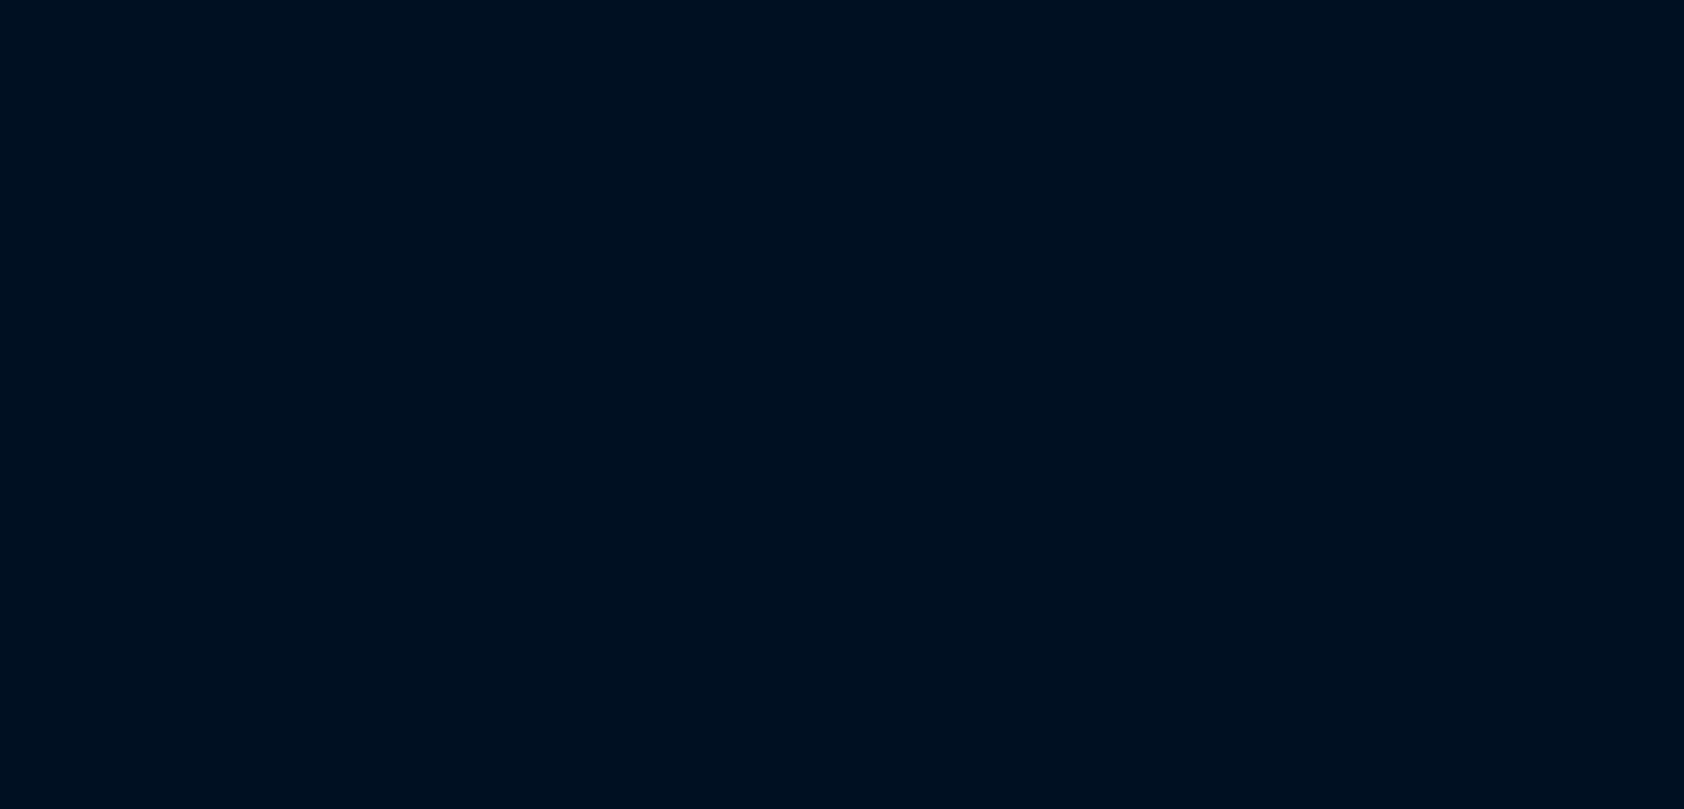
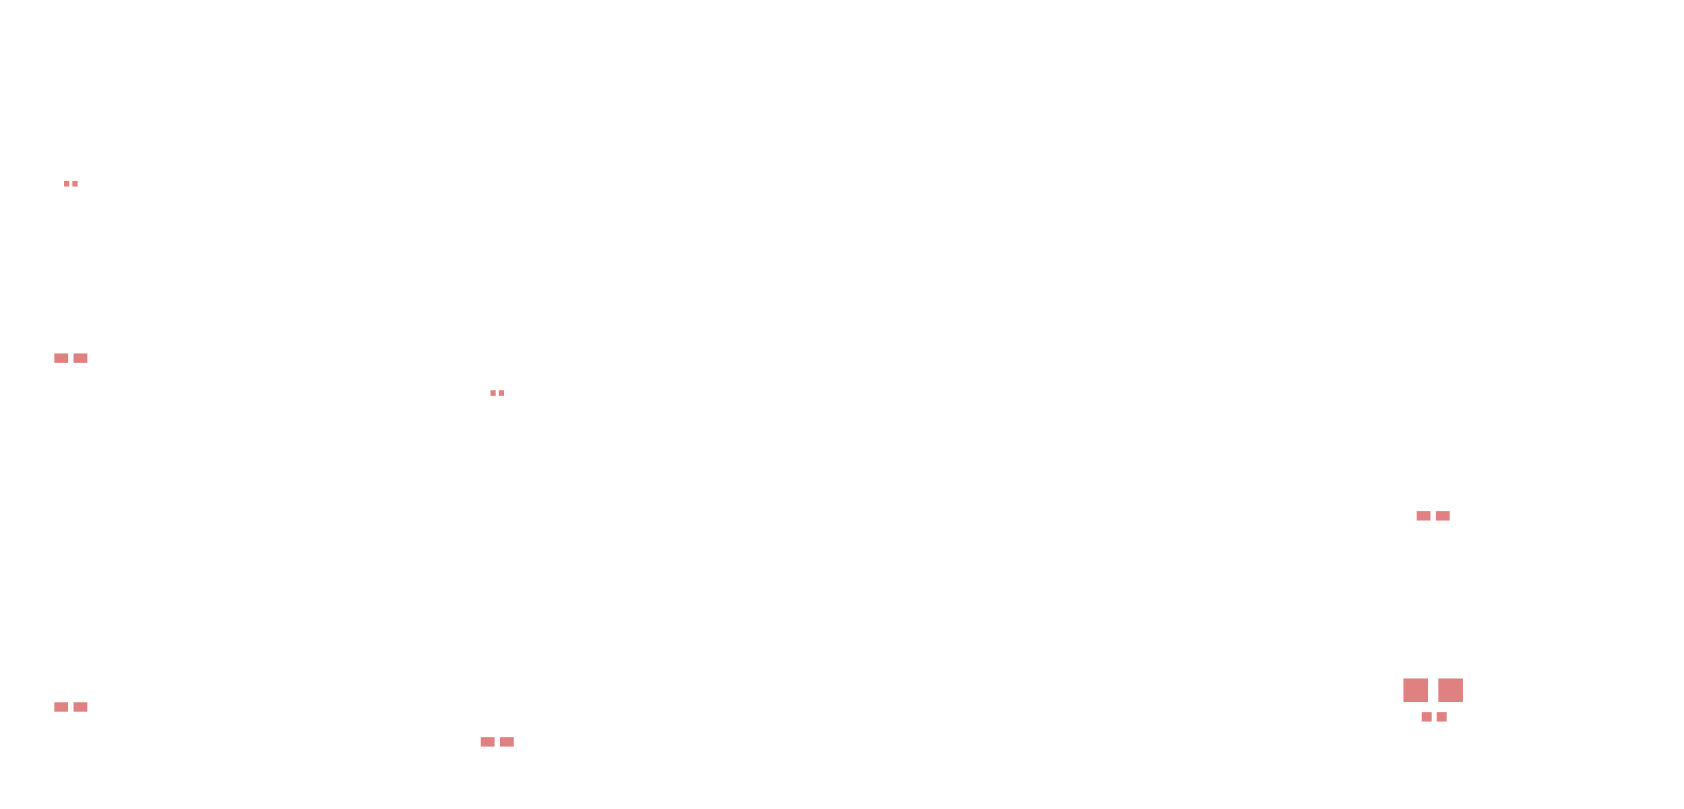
part: none -> (70, 183)
part: none -> (70, 358)
part: none -> (497, 393)
part: none -> (1433, 515)
part: none -> (1433, 690)
part: none -> (70, 706)
part: none -> (1434, 716)
part: none -> (497, 741)

